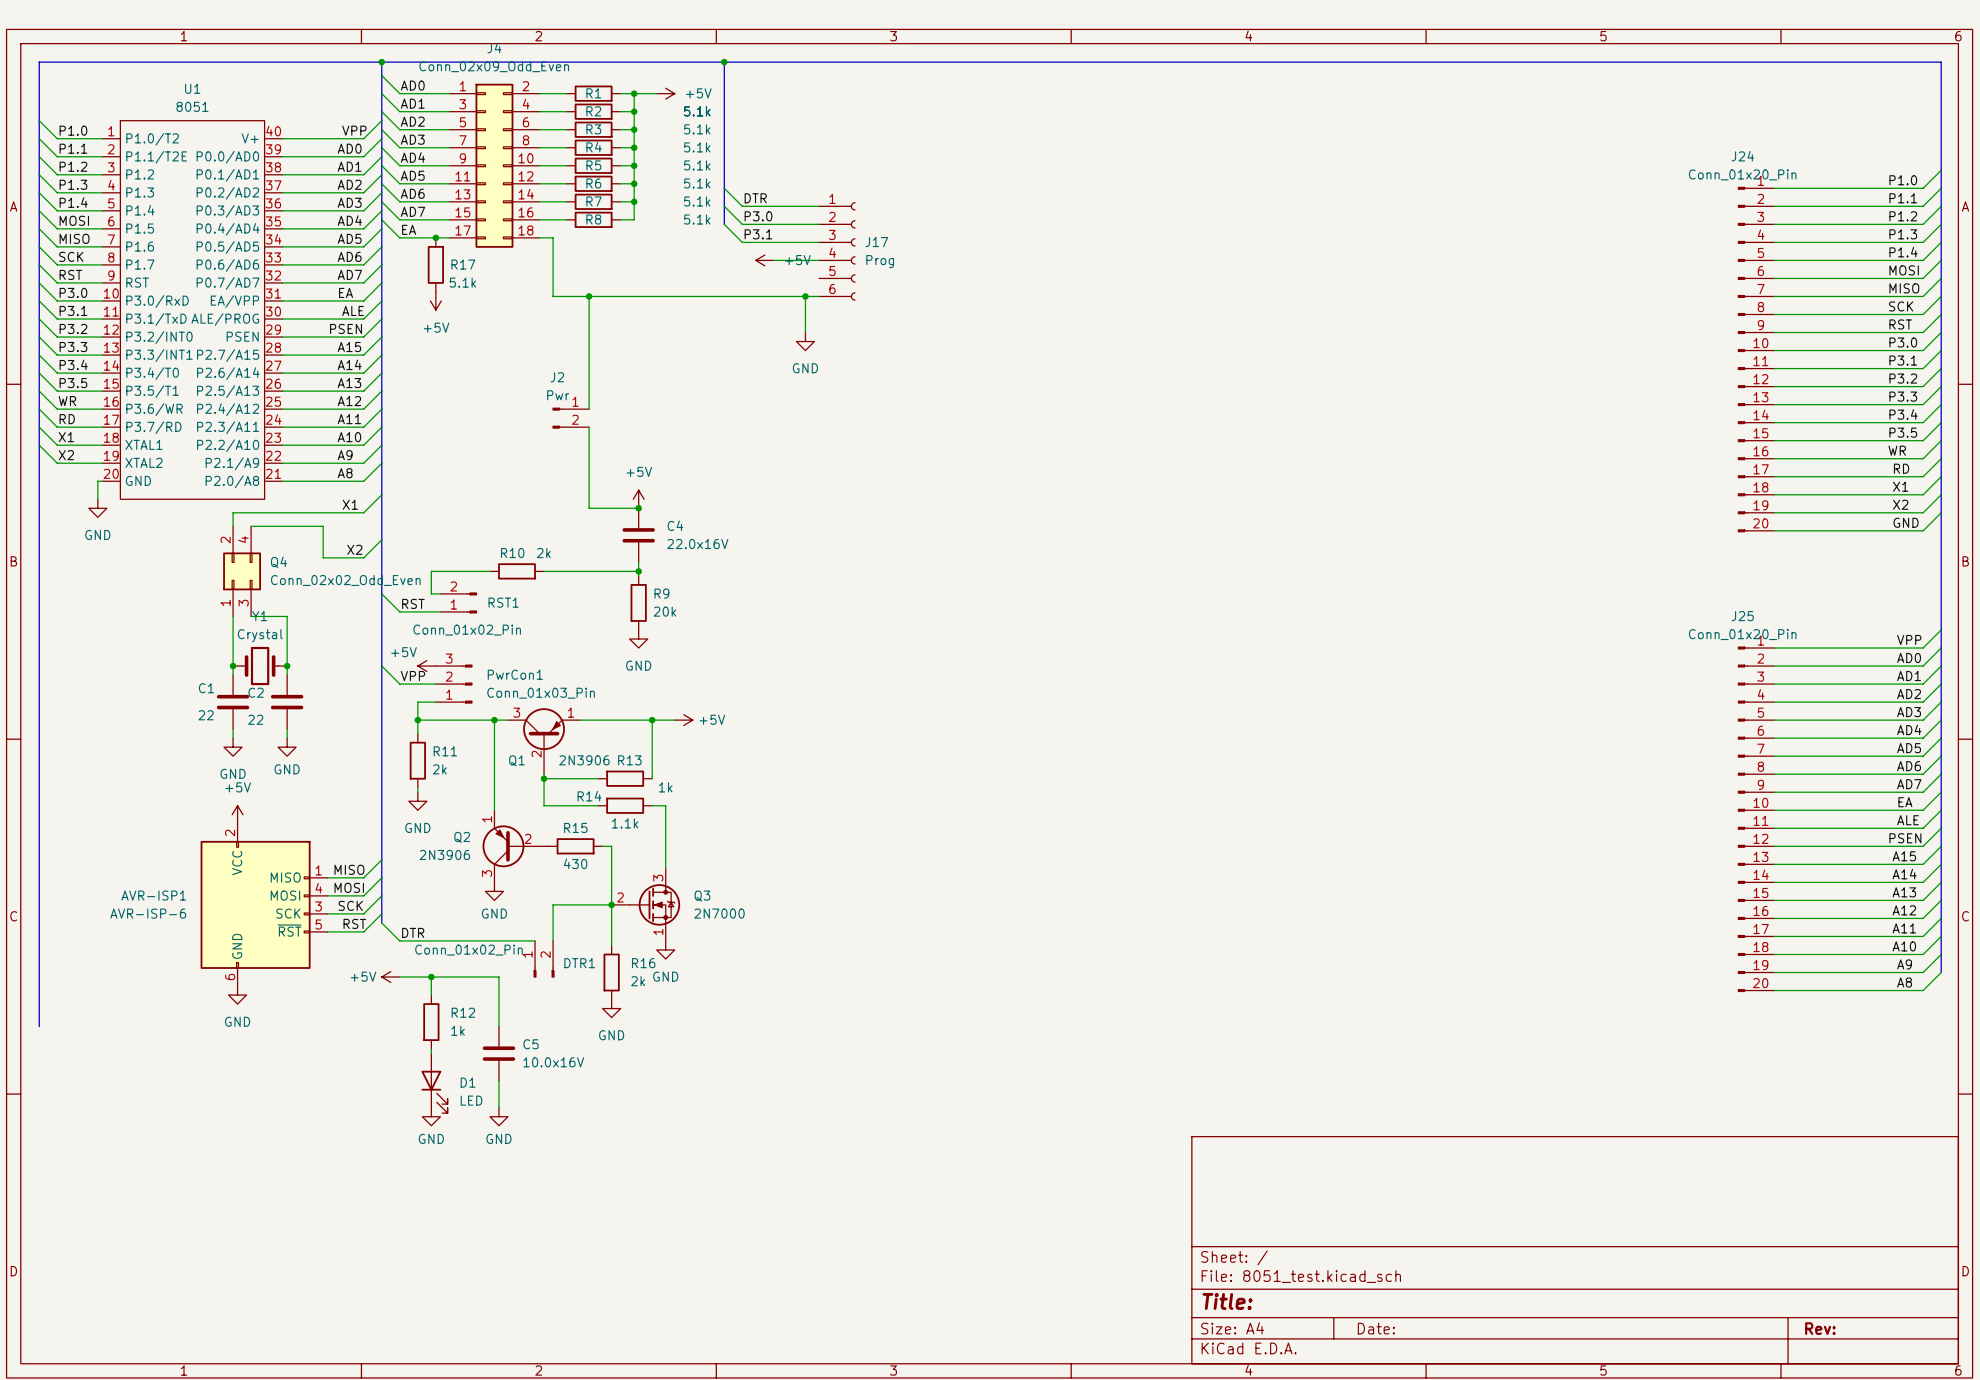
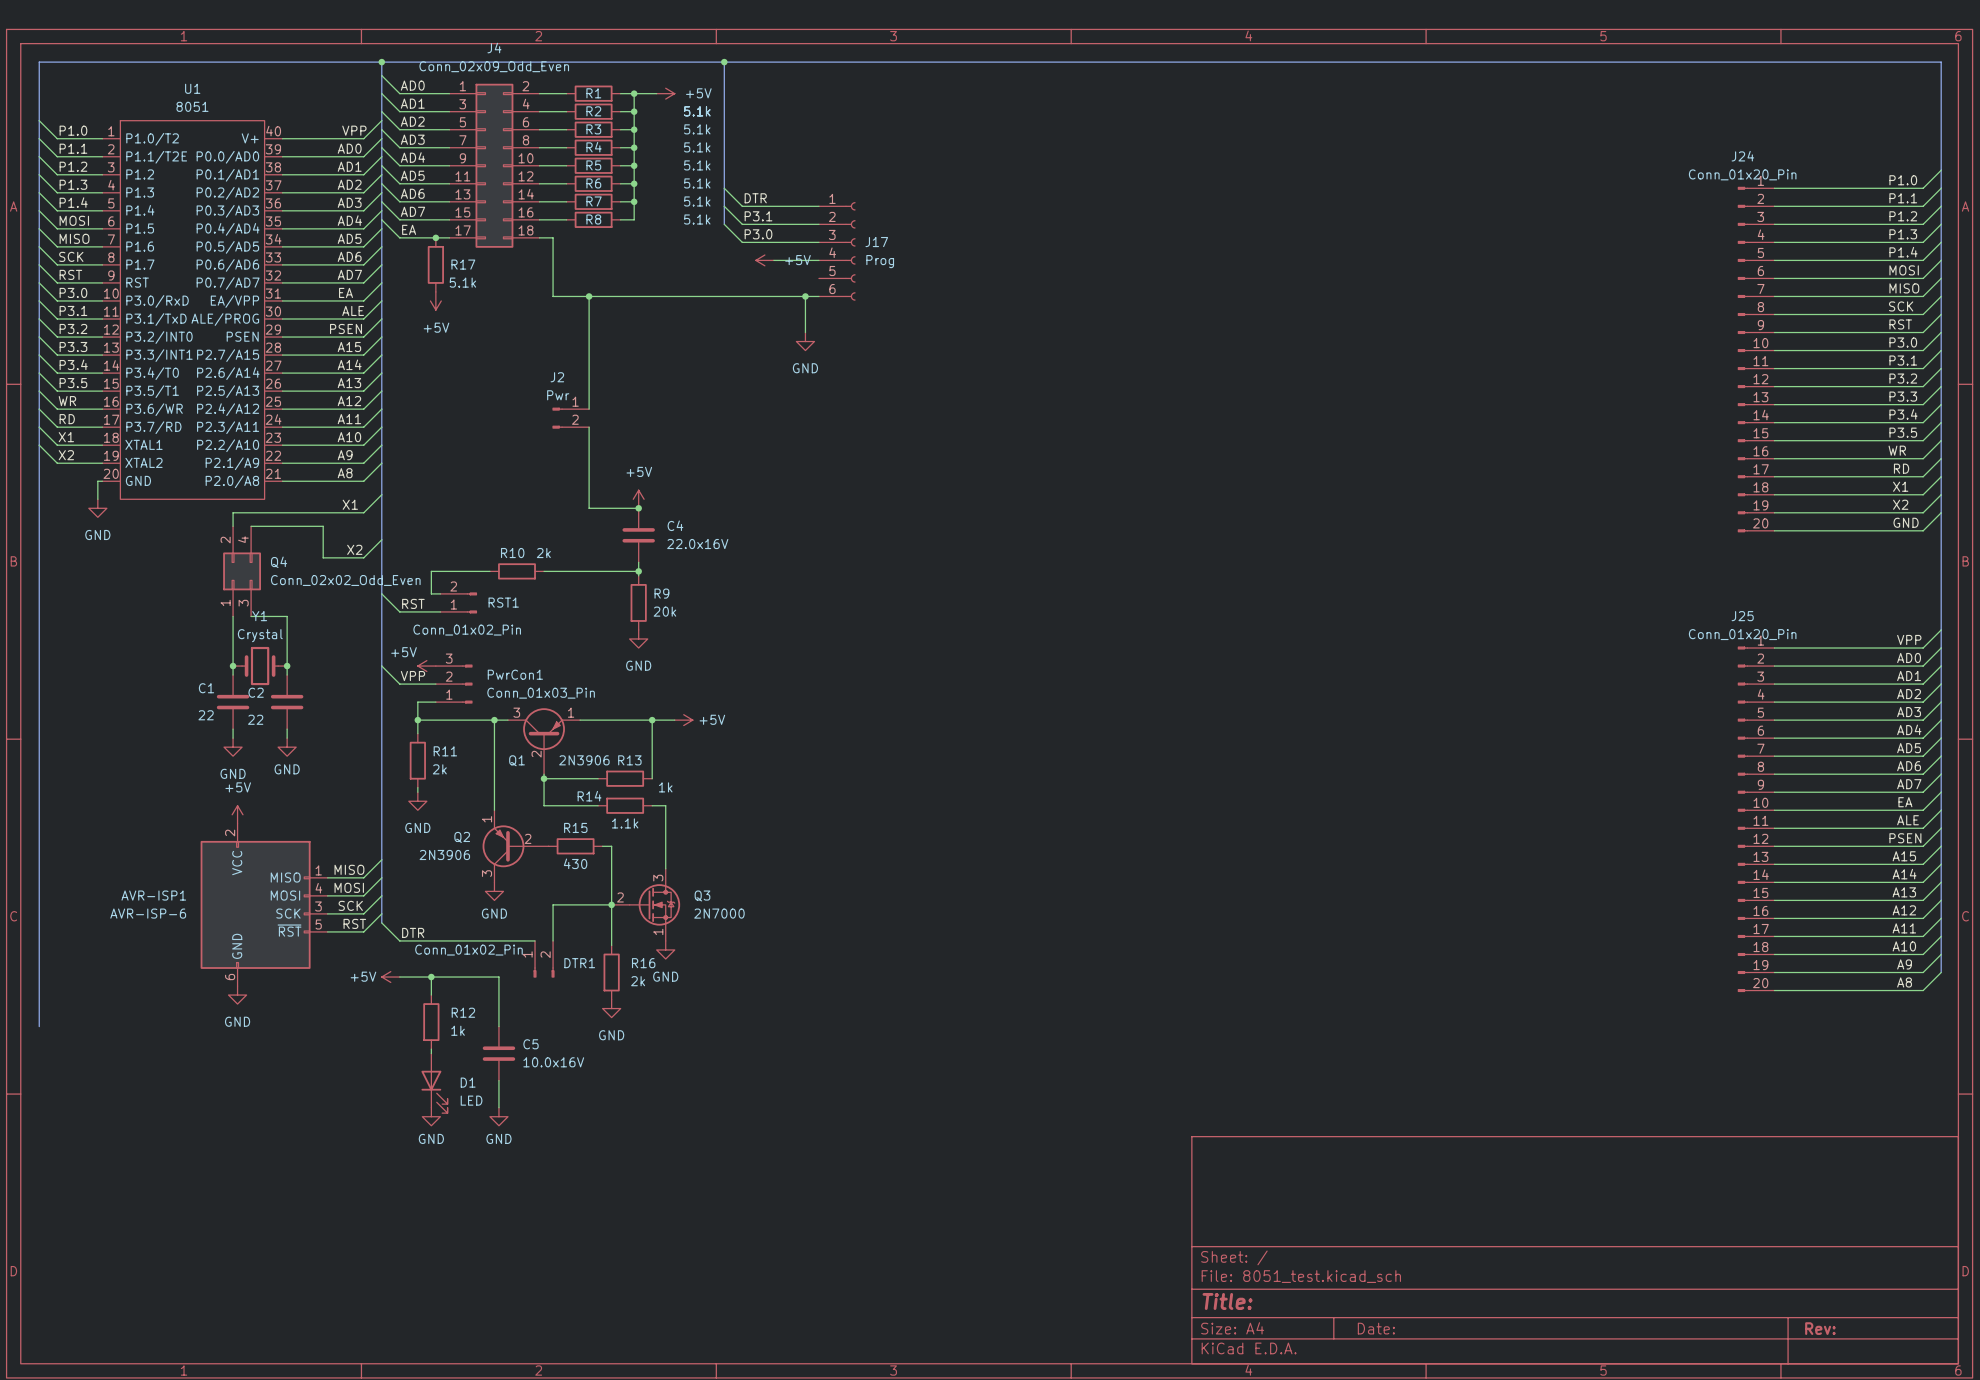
label: P3.0 (758, 216) -> P3.1 (758, 216)
label: P3.1 (758, 234) -> P3.0 (758, 234)

